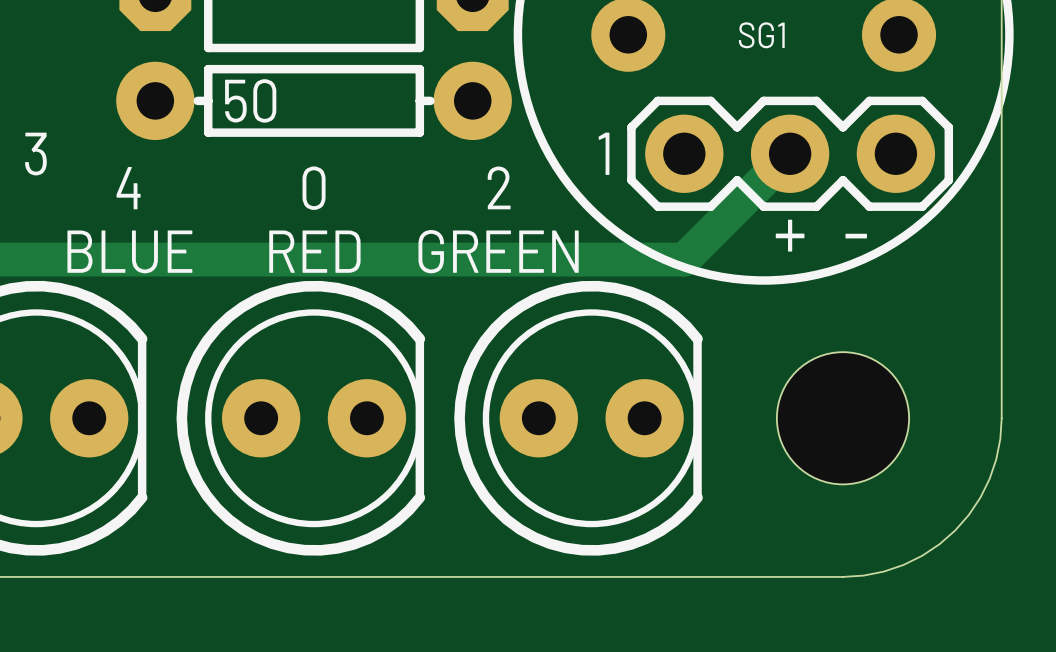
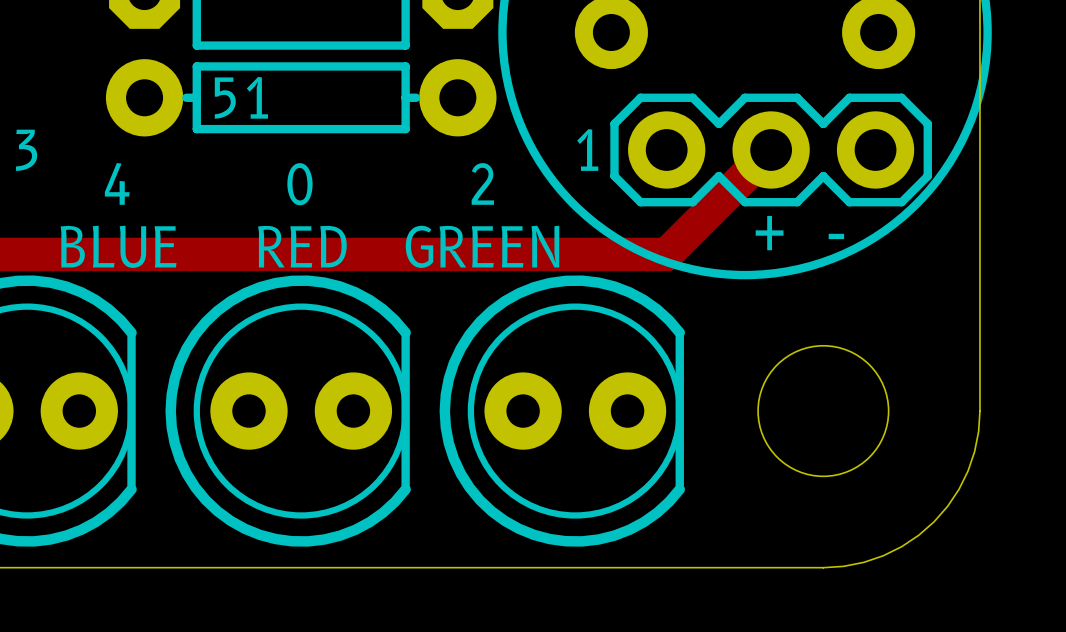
SG1 name: SG1 (761, 35) -> none
part value: 50 (250, 100) -> 51 (241, 97)

